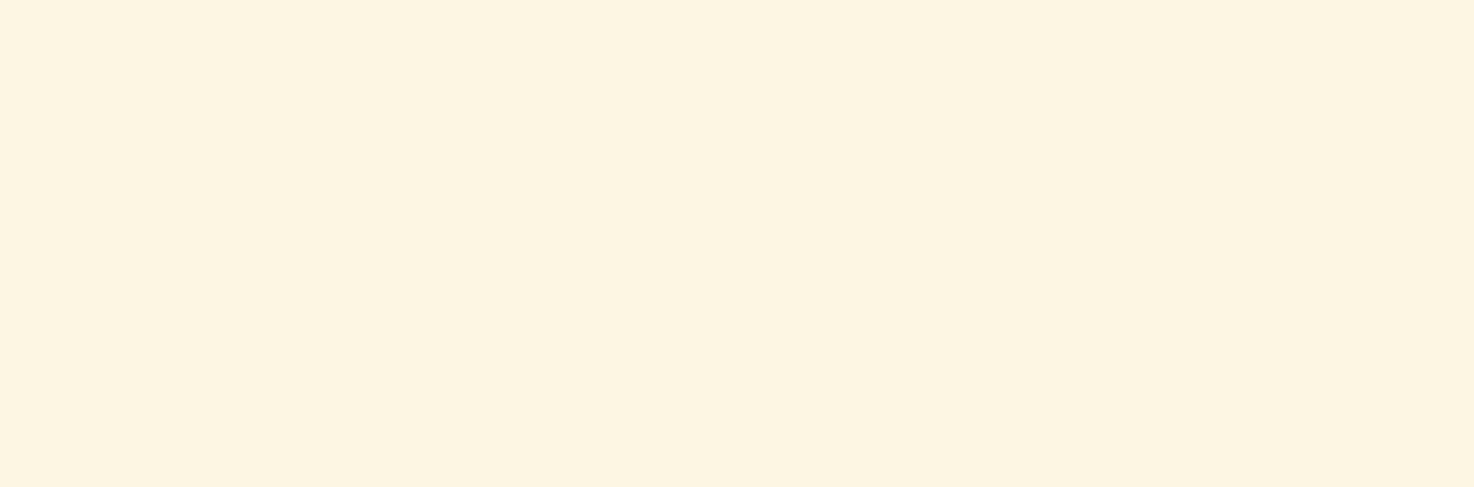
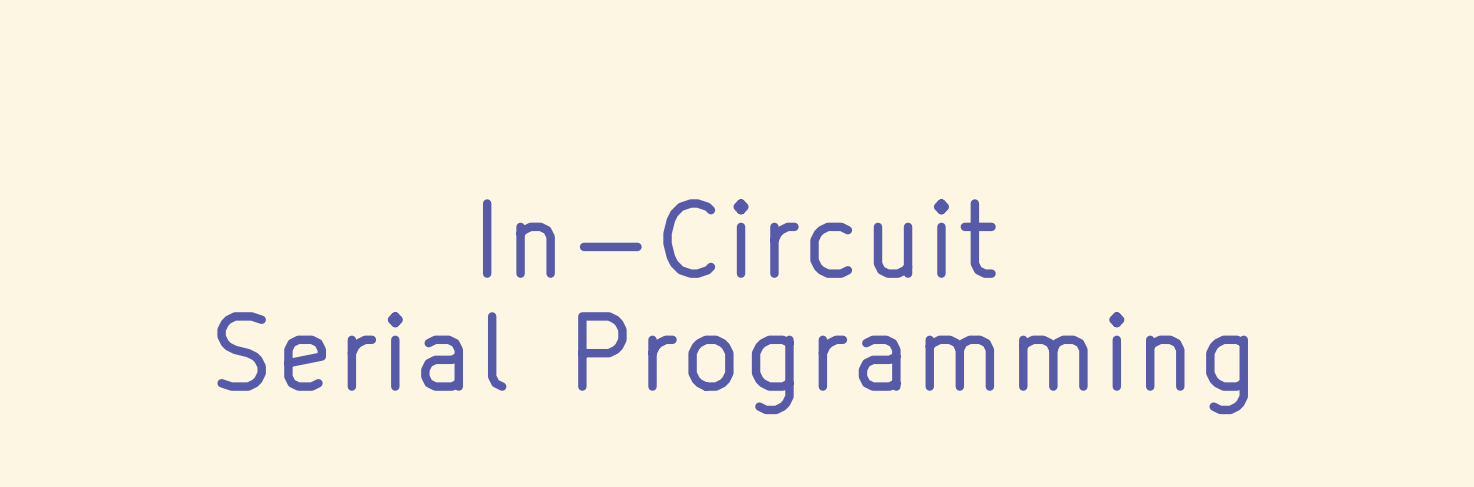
text: none -> In-Circuit (739, 238)
text: none -> Serial Programming (732, 363)

